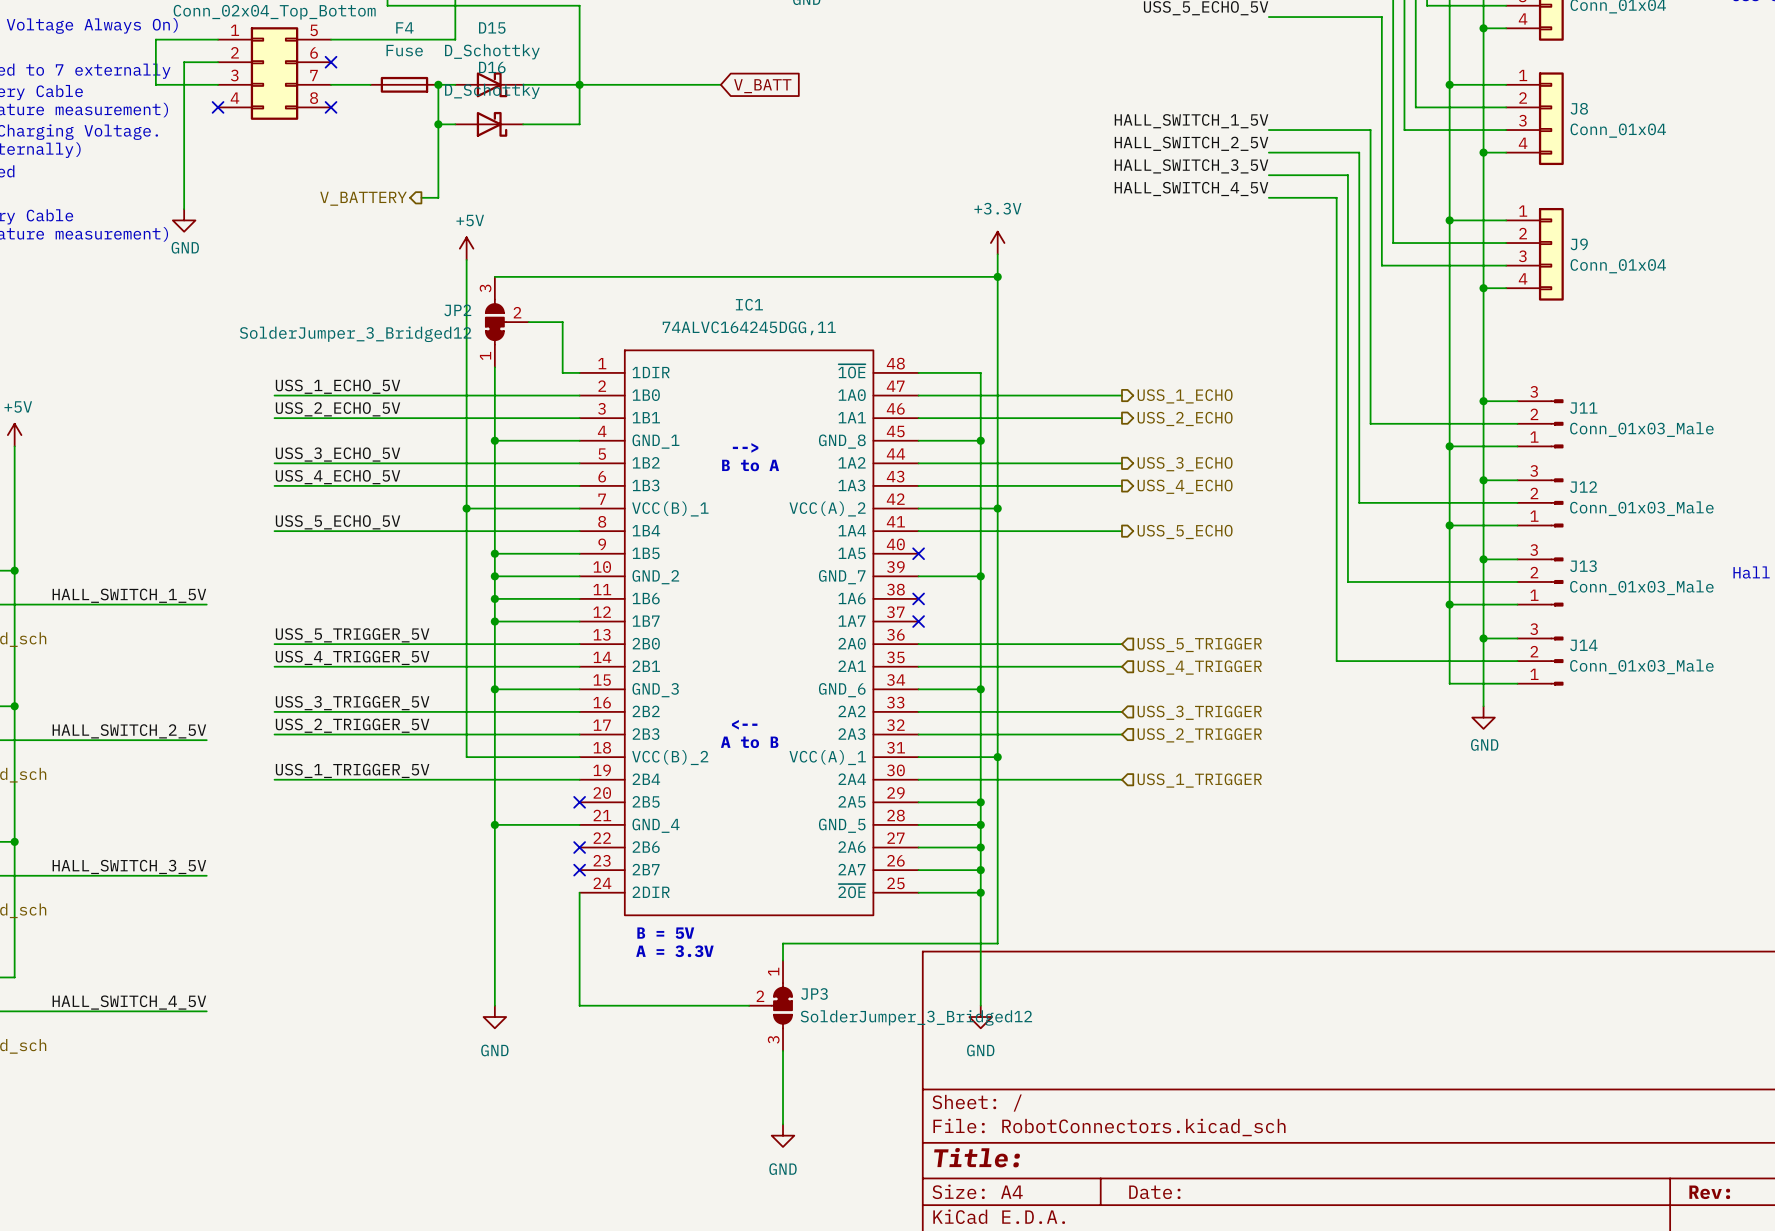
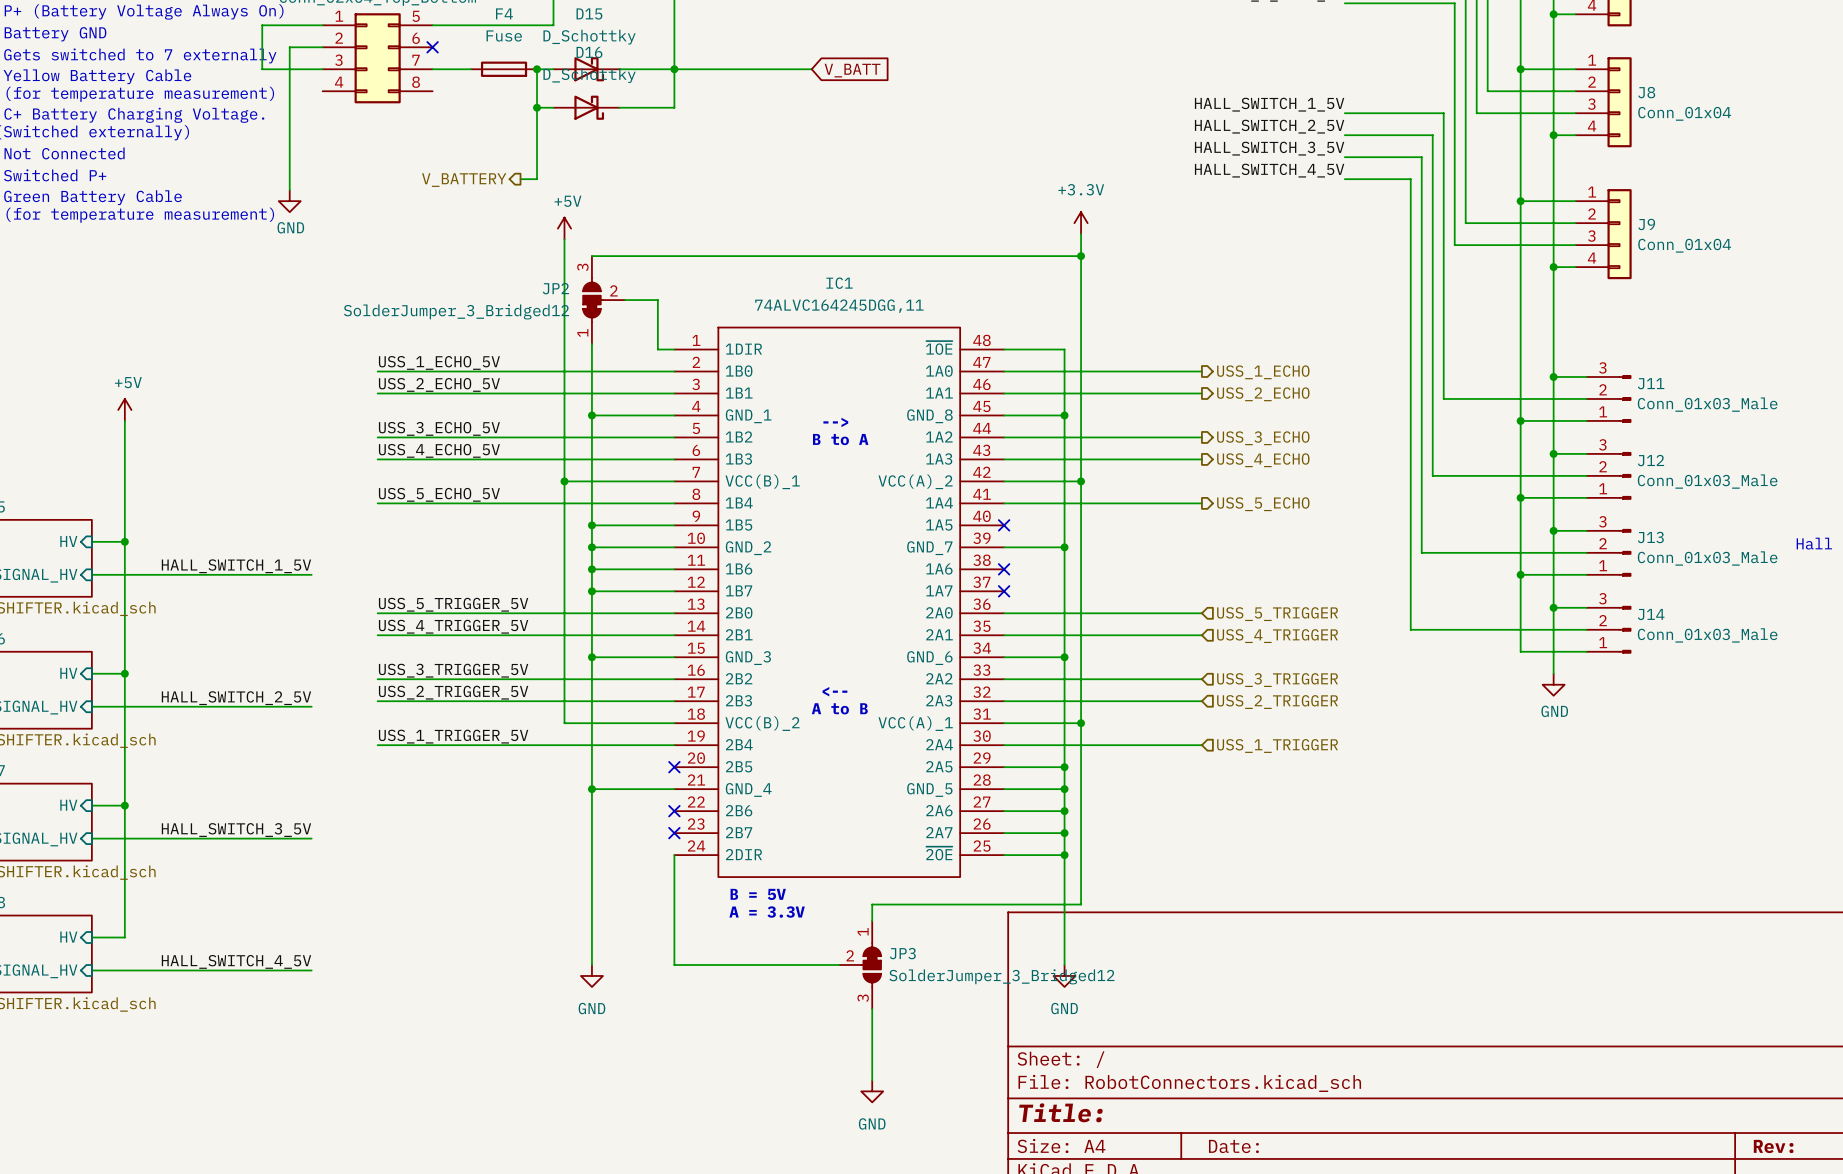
no-connect mark: (218, 107) -> none
no-connect mark: (331, 107) -> none

